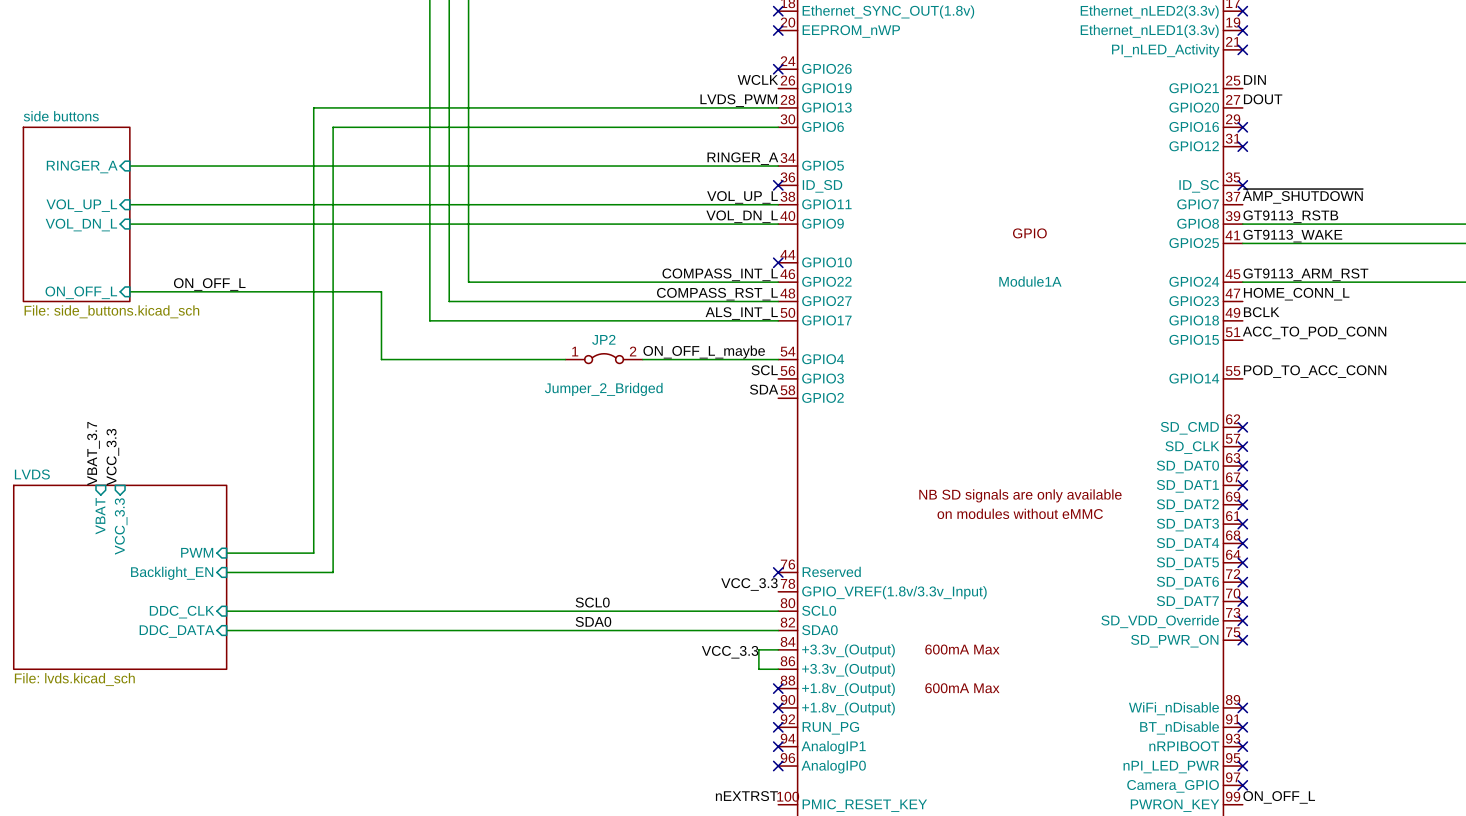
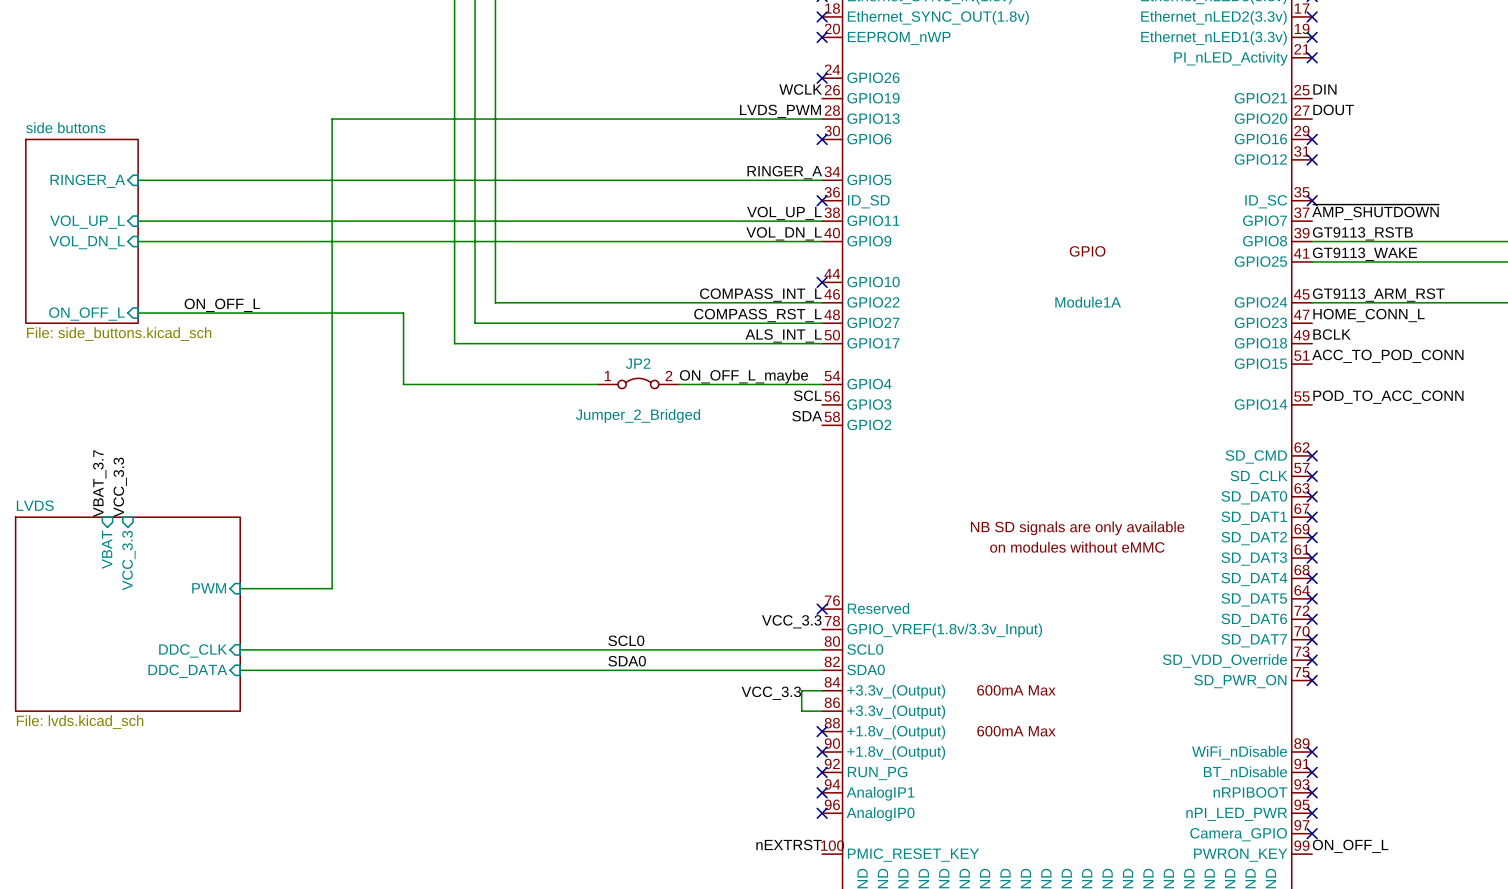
wire: (778, 127) (333, 127) (333, 572) (226, 572) -> none
no-connect mark: none -> (822, 139)
sheet pin: Backlight_EN (172, 573) -> none

